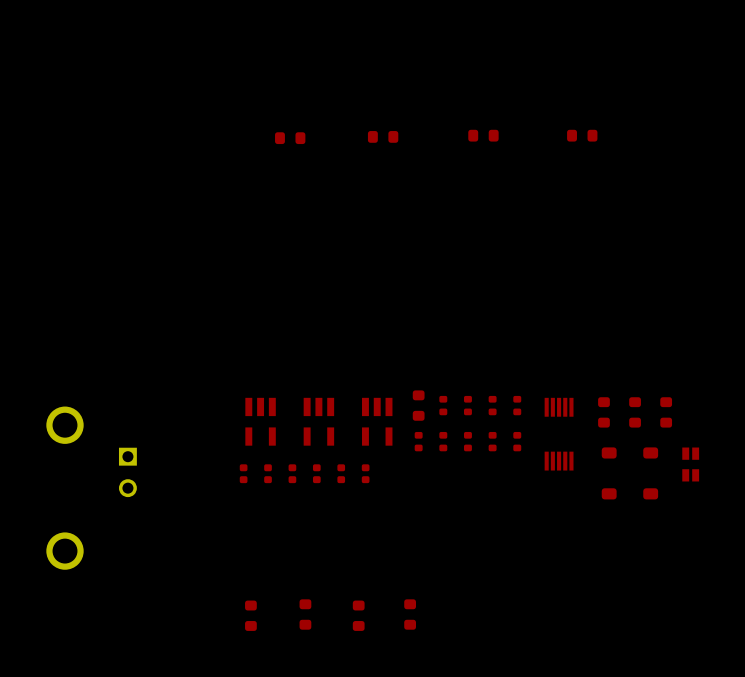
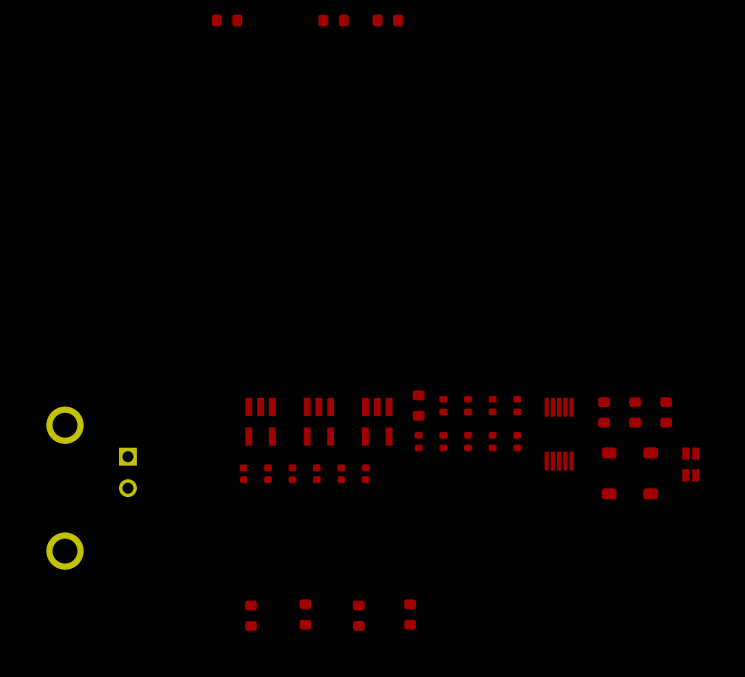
part: none -> (227, 20)
part: none -> (333, 20)
part: none -> (387, 20)
part: (483, 135) -> none
part: (582, 135) -> none
part: (383, 136) -> none
part: (290, 138) -> none

